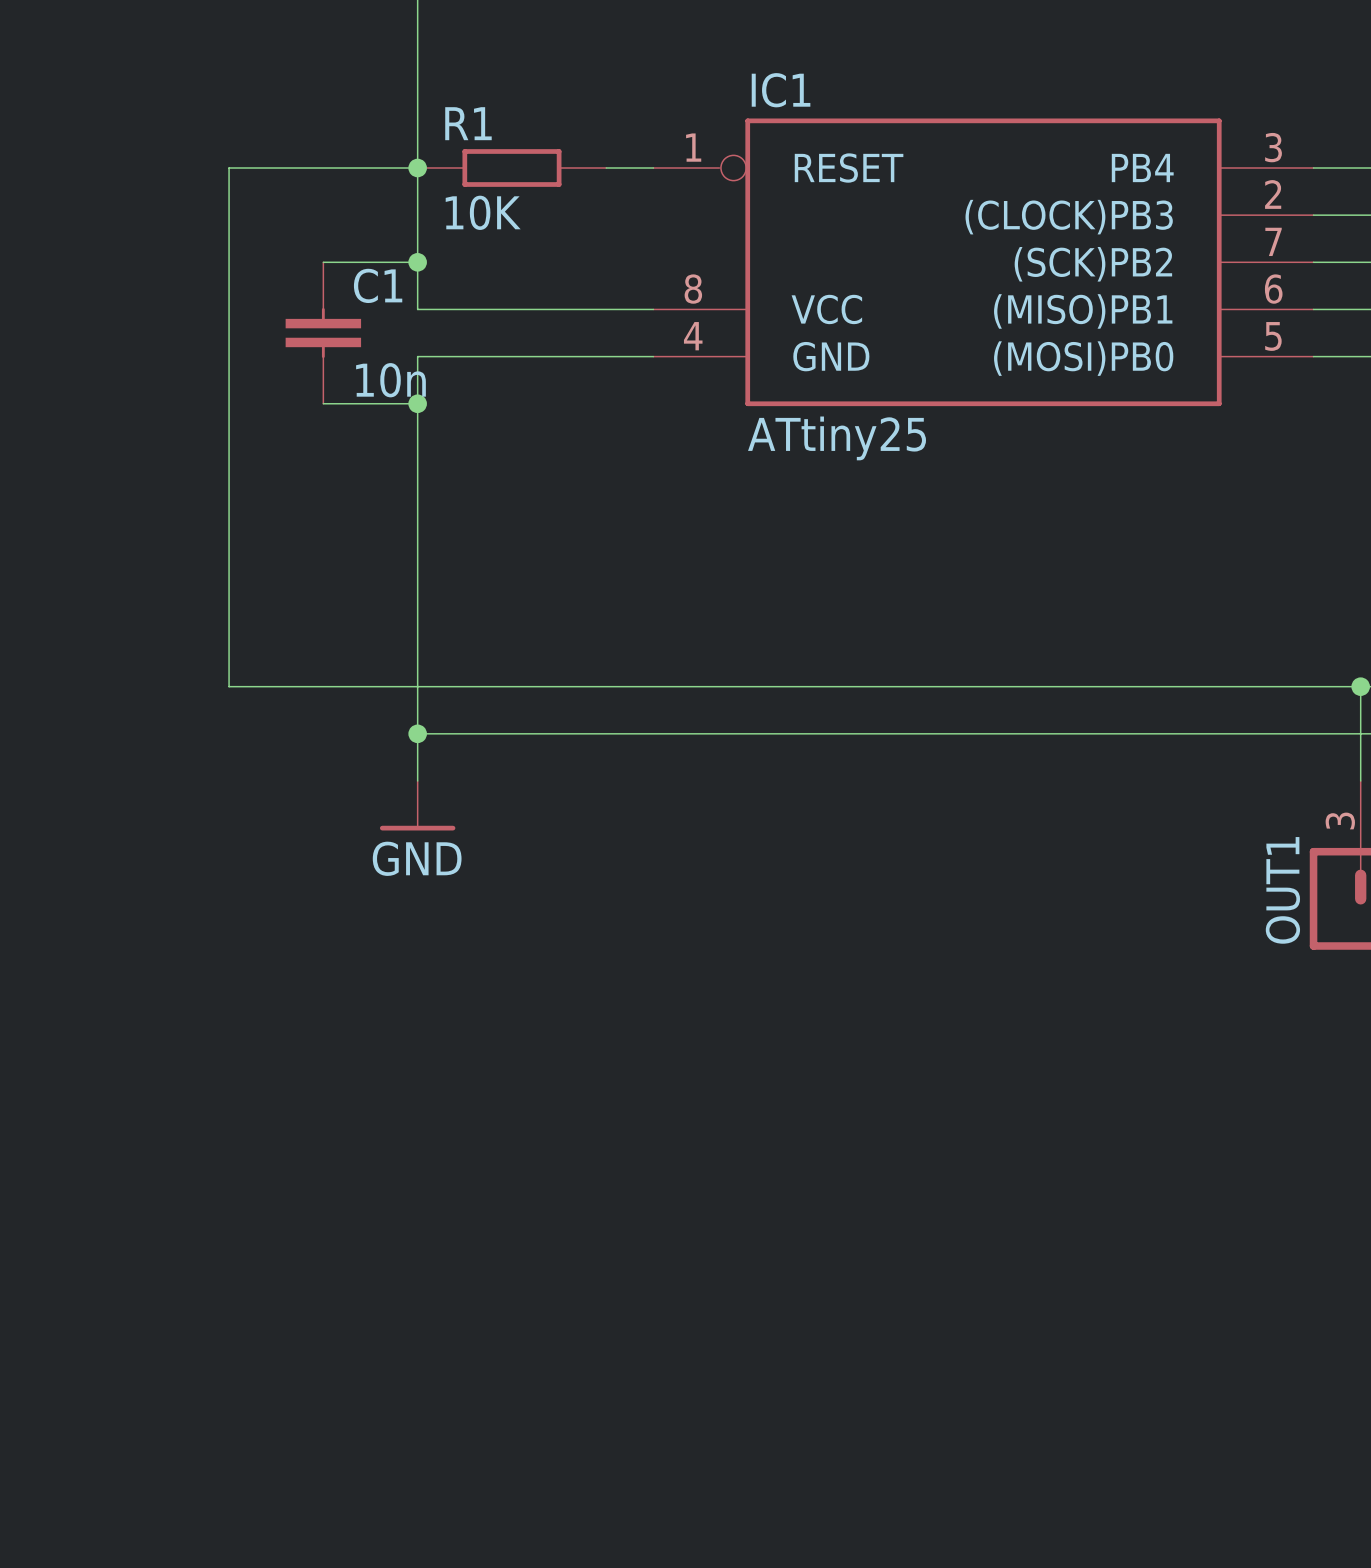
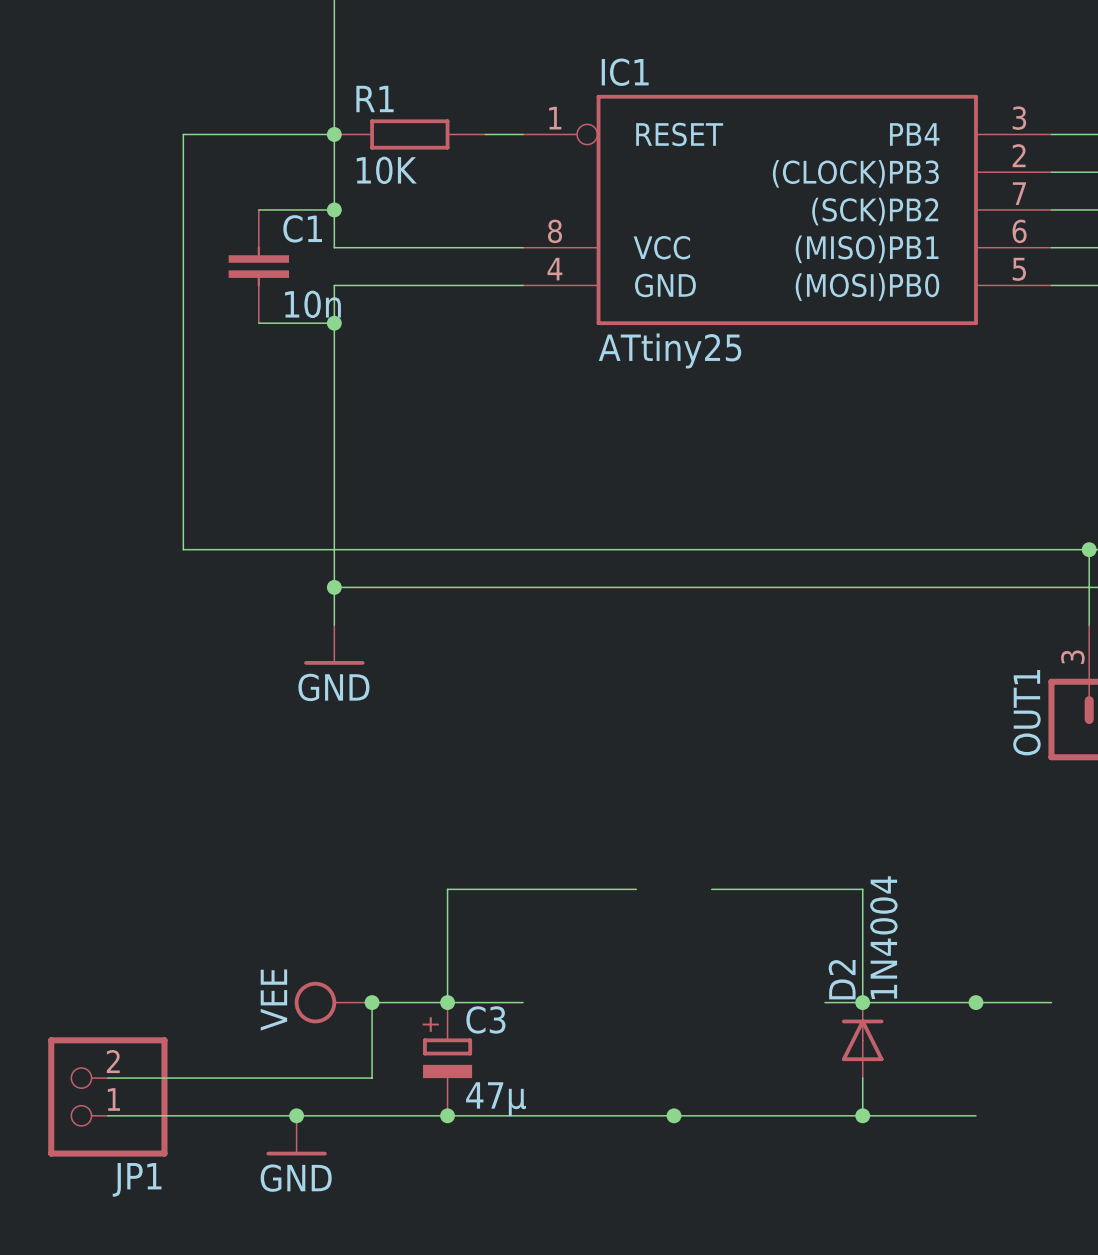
wire: none -> (636, 889) (447, 889) (447, 1002)
wire: none -> (711, 889) (862, 889) (862, 1002)
power symbol: none -> VEE (333, 1002)
junction: none -> (372, 1002)
junction: none -> (447, 1002)
wire: none -> (523, 1002) (372, 1002) (372, 1078) (107, 1078)
wire: none -> (825, 1002) (1051, 1002)
junction: none -> (862, 1002)
junction: none -> (975, 1002)
D2: none -> 1N4004 (862, 1040)
C3: none -> 47µ (447, 1059)
wire: none -> (862, 1078) (862, 1115)
JP1: none -> (107, 1096)
wire: none -> (107, 1115) (975, 1115)
junction: none -> (296, 1115)
junction: none -> (447, 1115)
junction: none -> (674, 1115)
junction: none -> (862, 1115)
power symbol: none -> GND (296, 1135)

